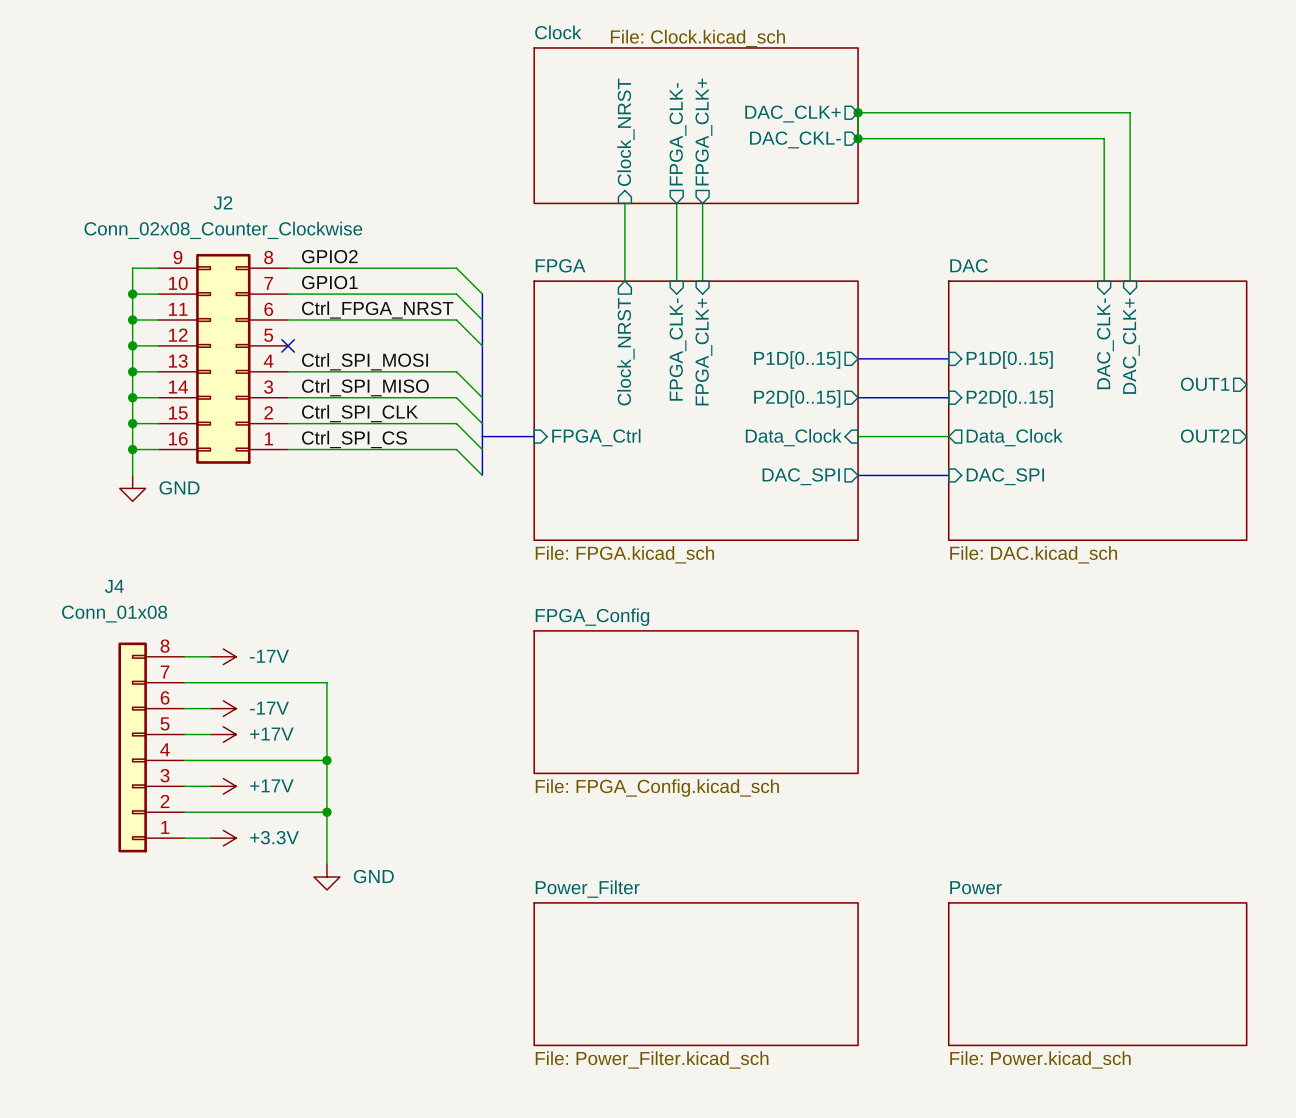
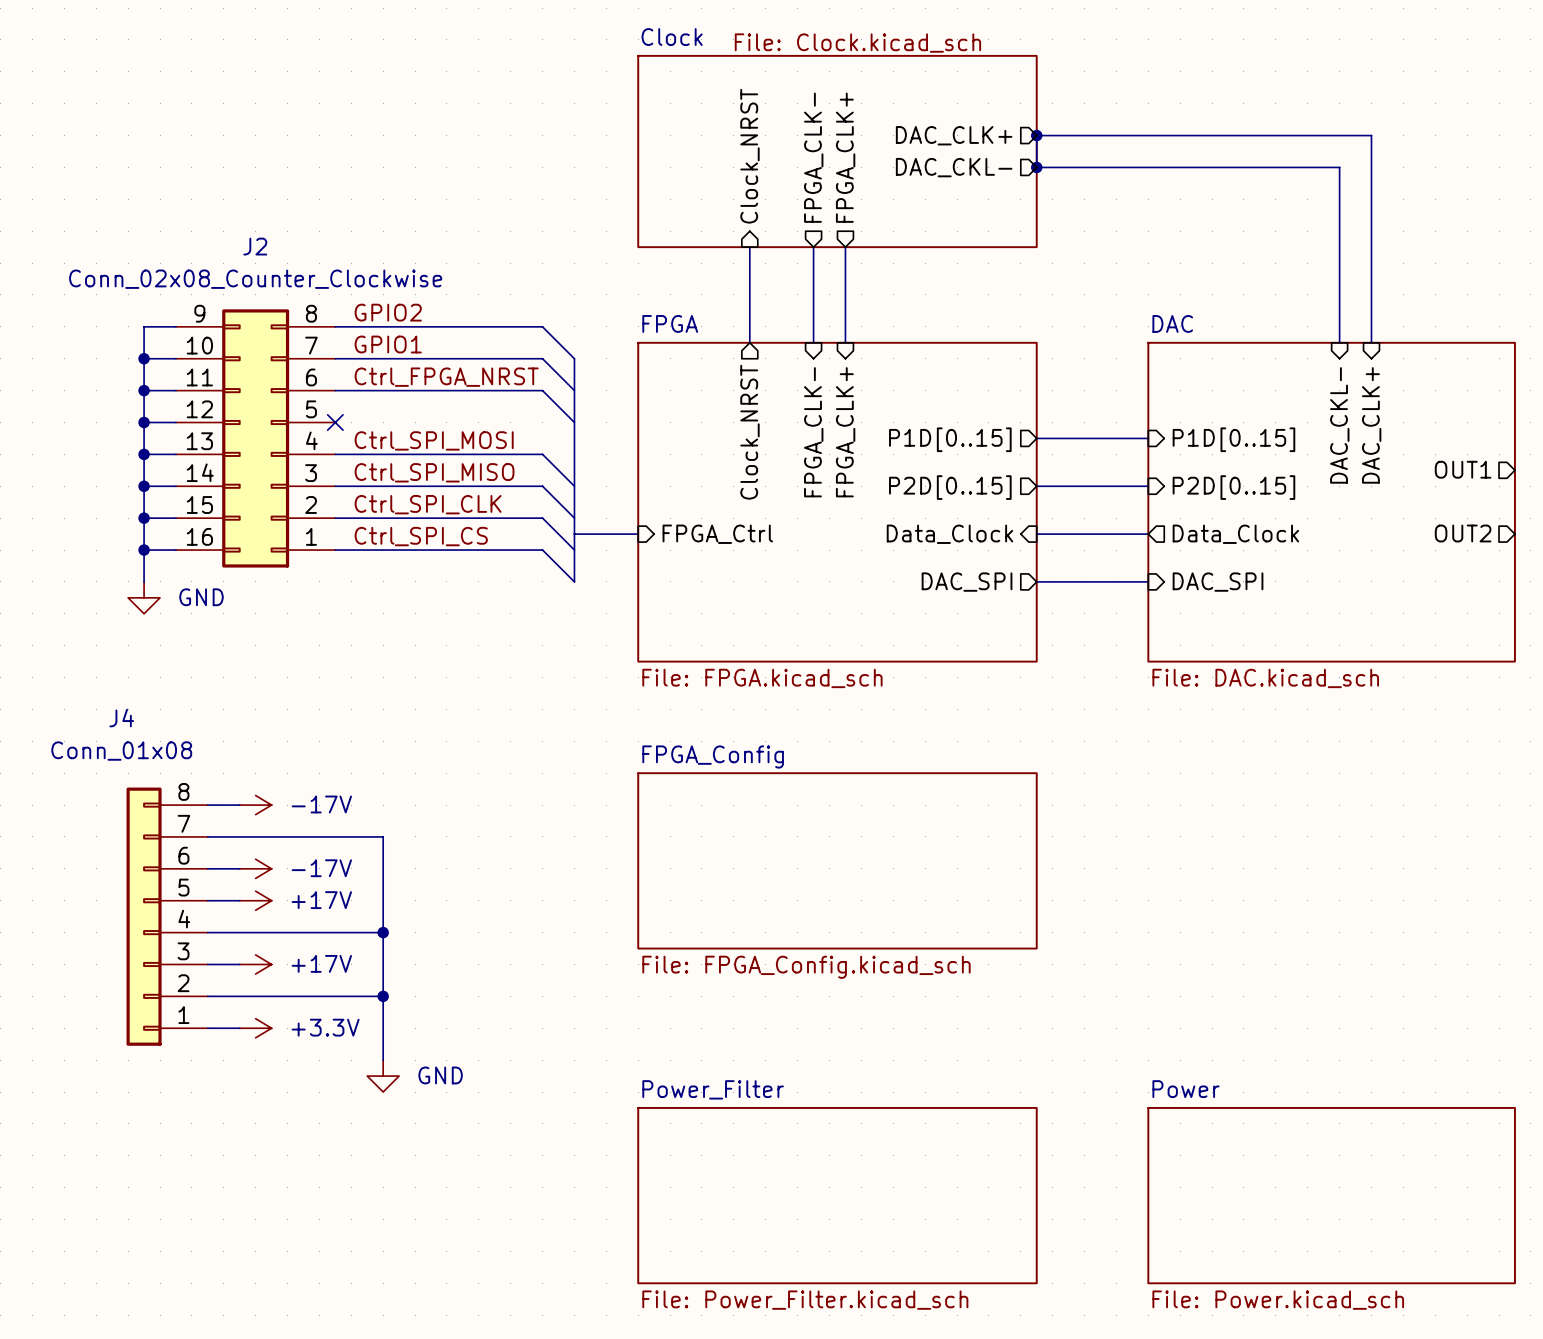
sheet pin: DAC_CLK- (1105, 343) -> DAC_CKL- (1339, 425)

